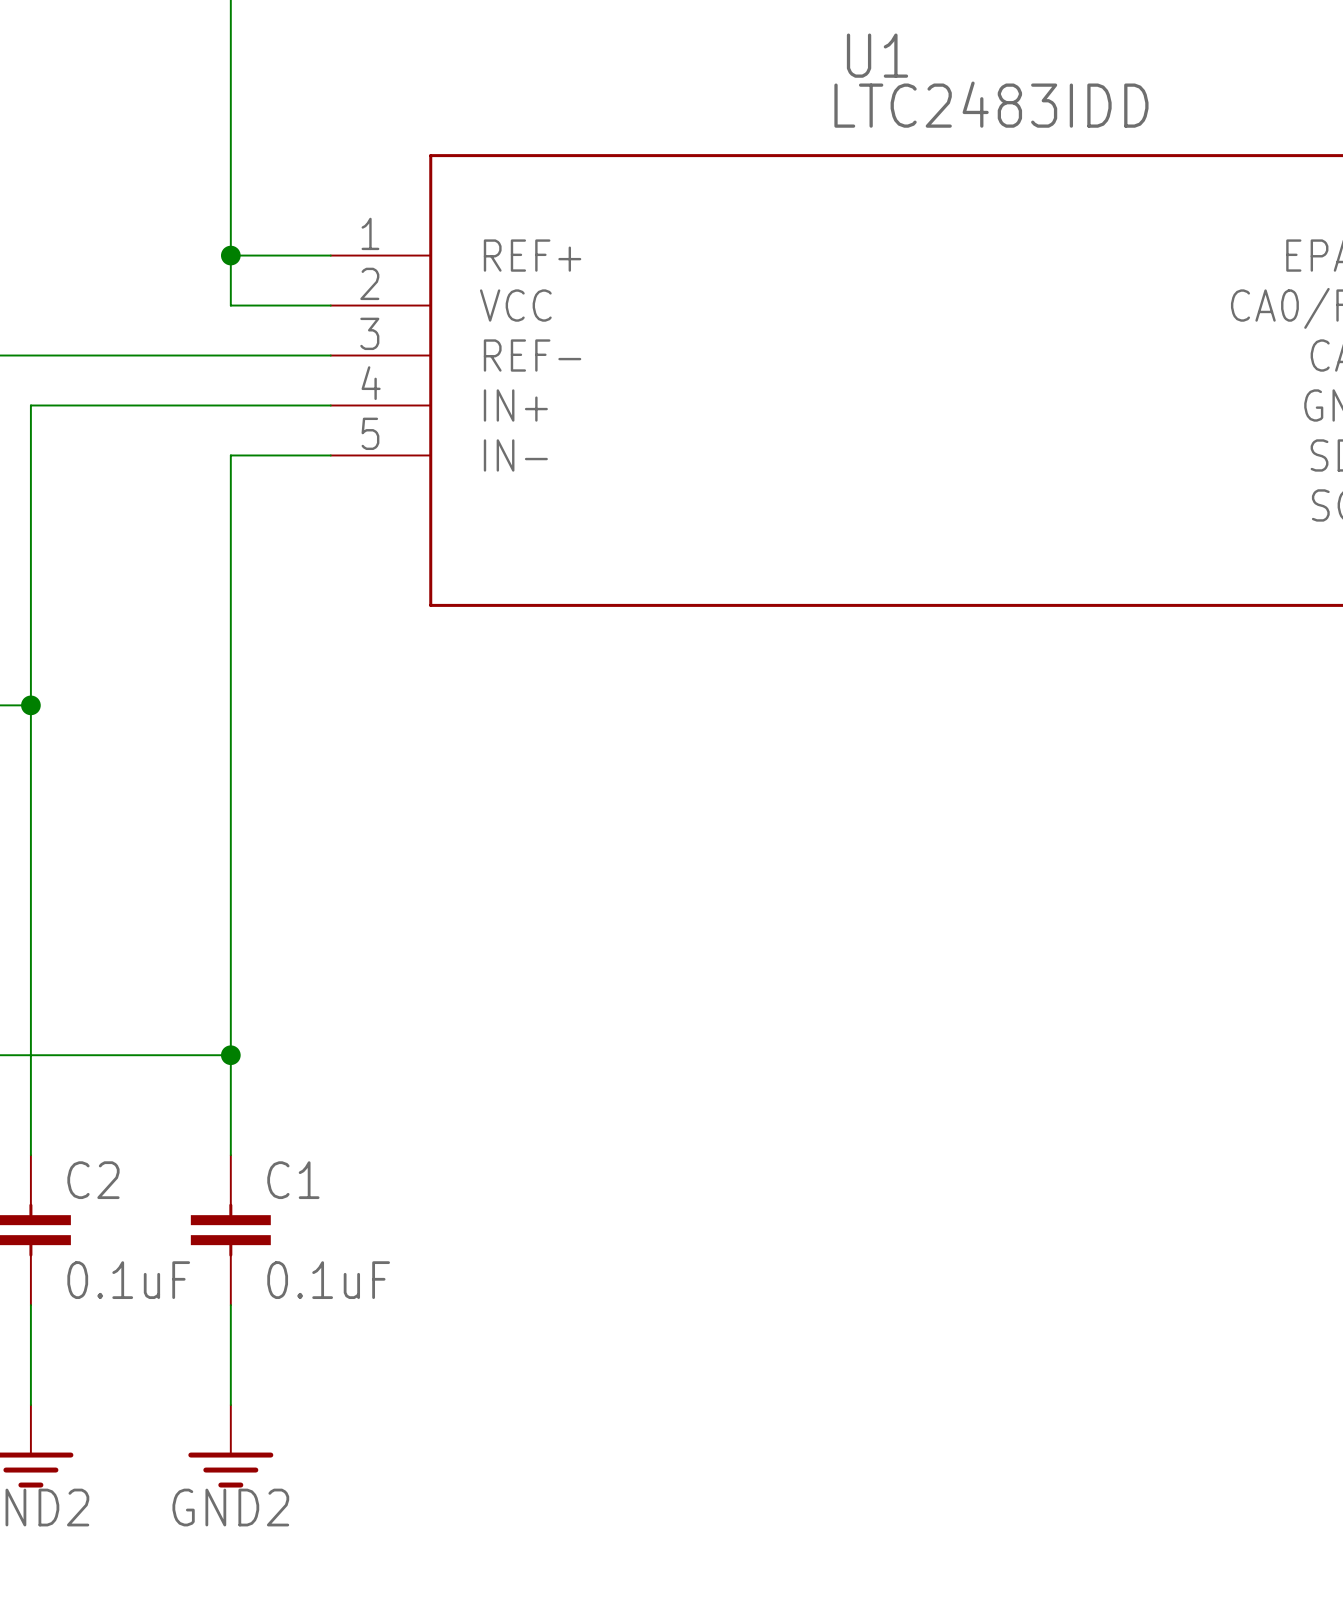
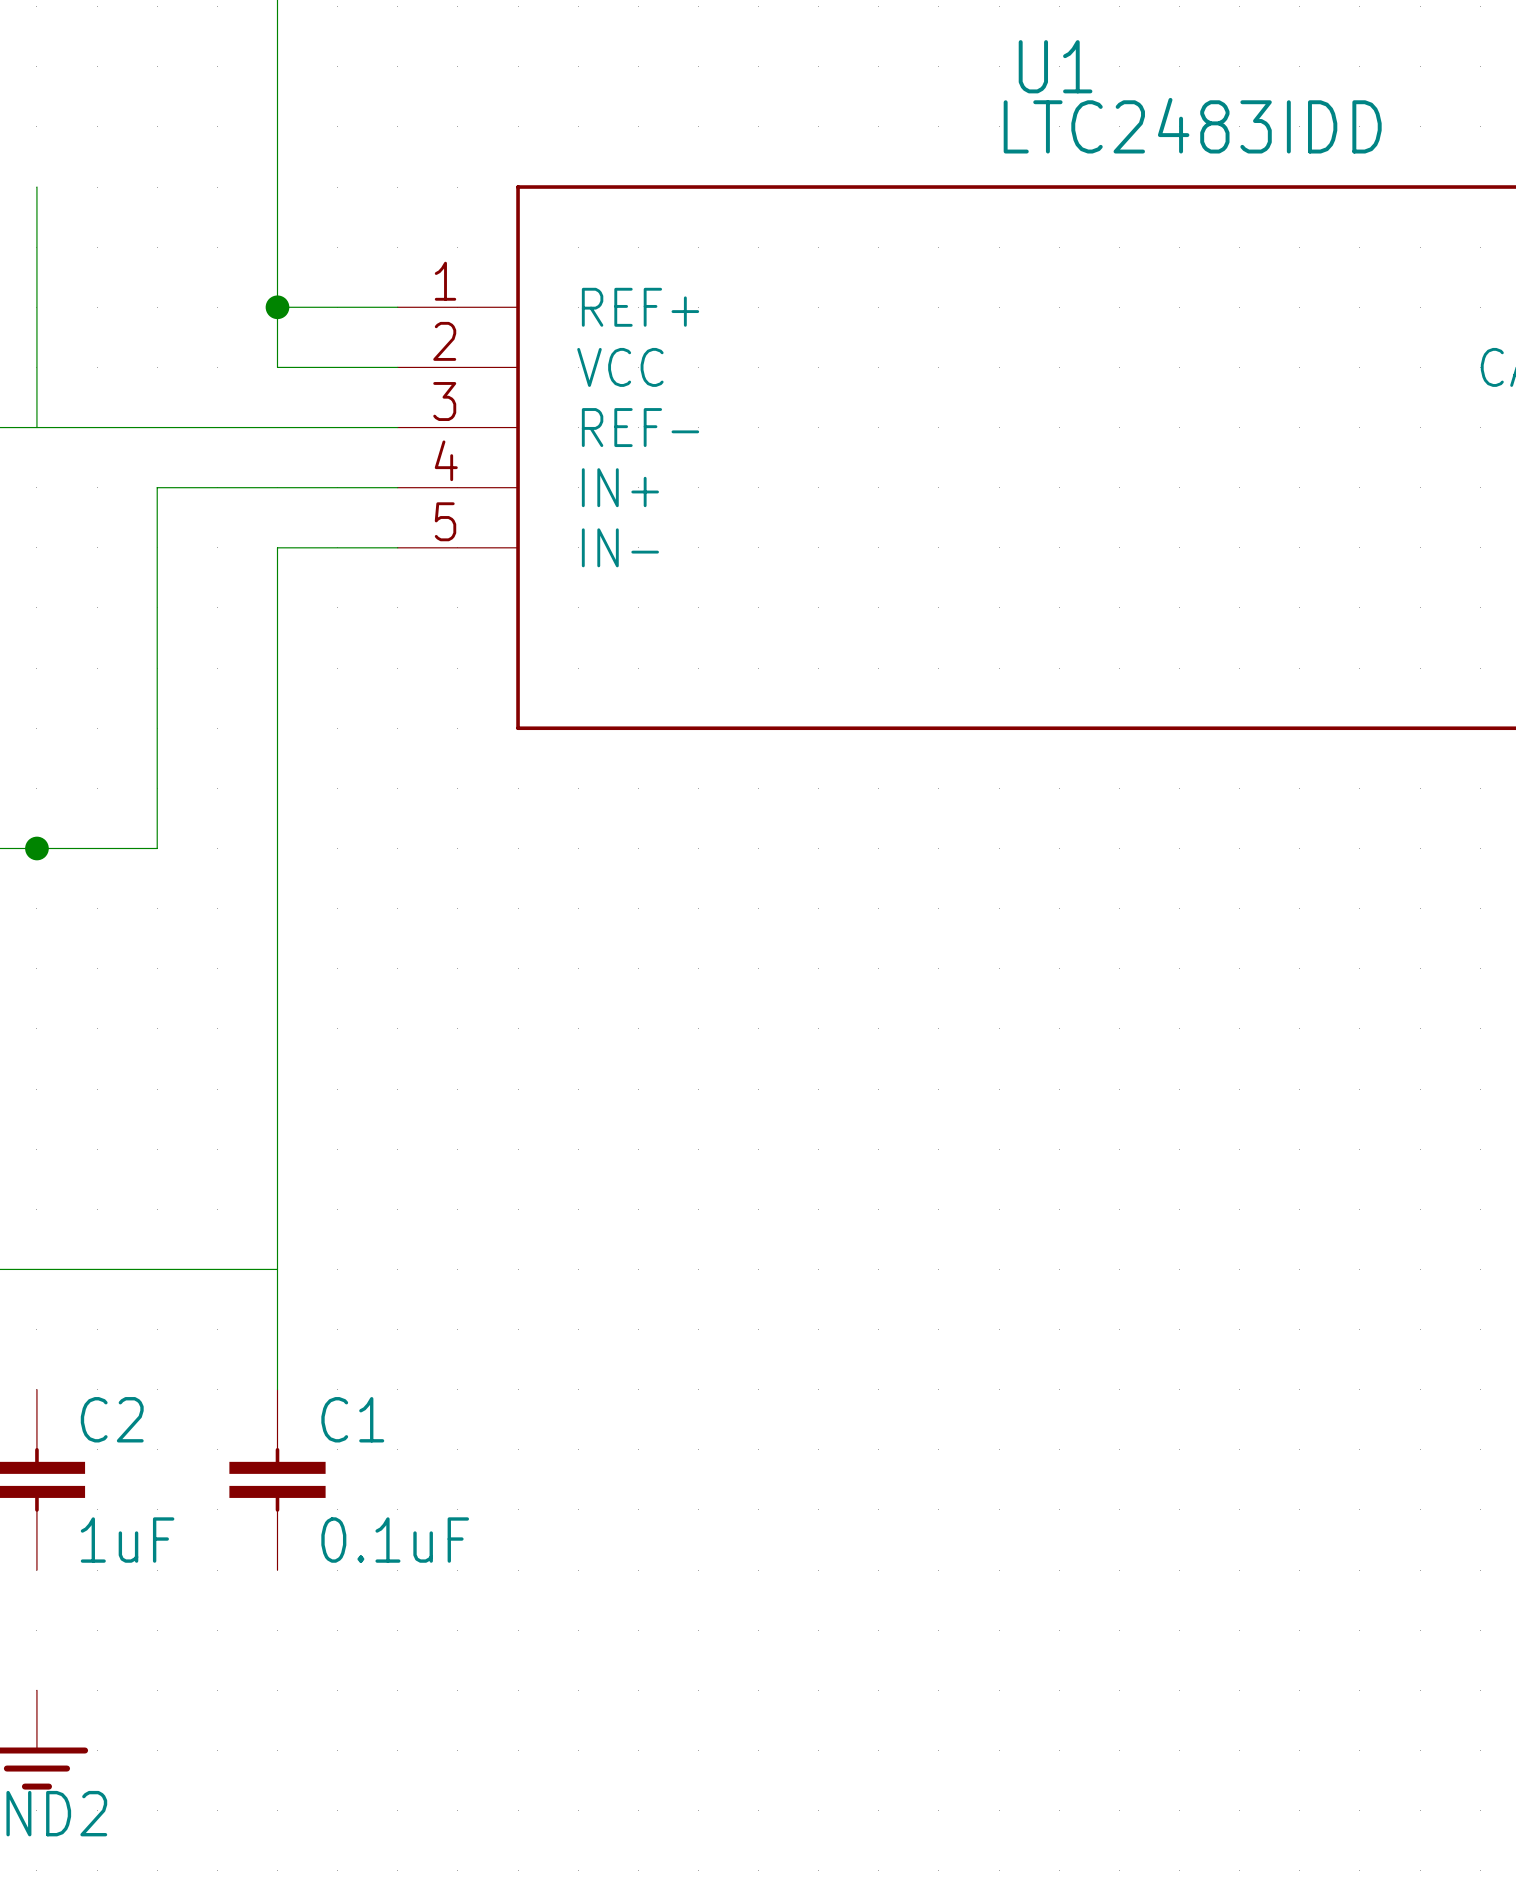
wire: none -> (36, 187) (36, 427)
wire: (130, 405) (30, 405) (30, 1155) -> (157, 487) (157, 848) (36, 848)
junction: (230, 1055) -> none
C2 value: 0.1uF (128, 1280) -> 1uF (127, 1540)
wire: (30, 1305) (30, 1405) -> none
wire: (230, 1305) (230, 1405) -> none
power symbol: GND2 (230, 1446) -> none

